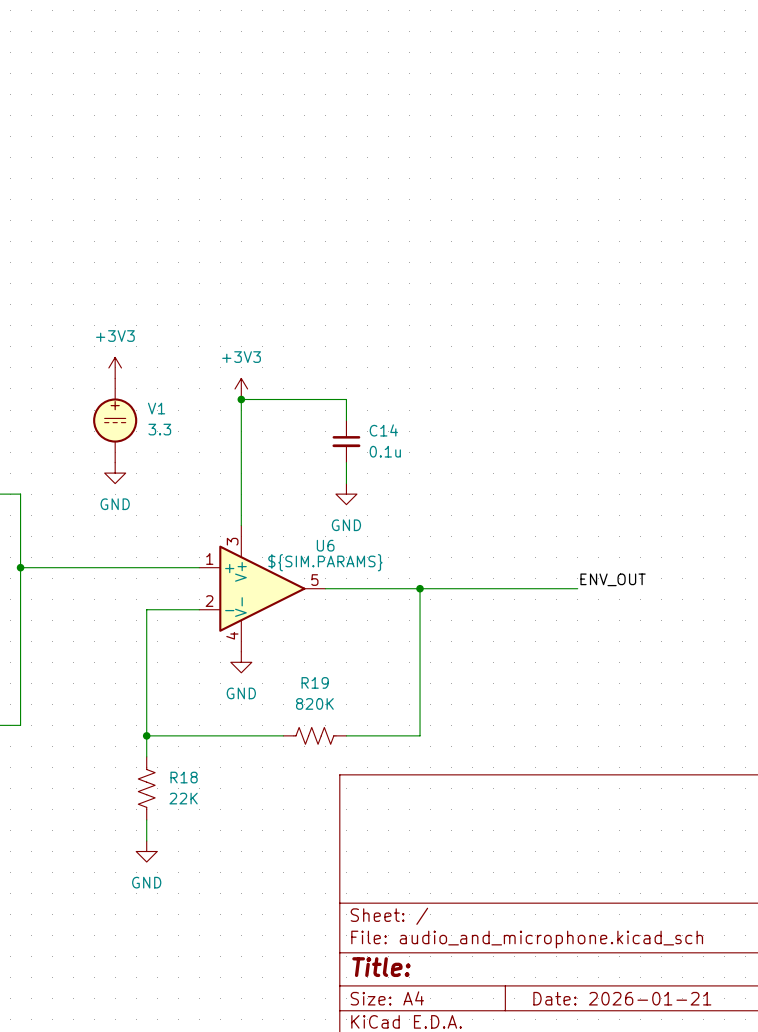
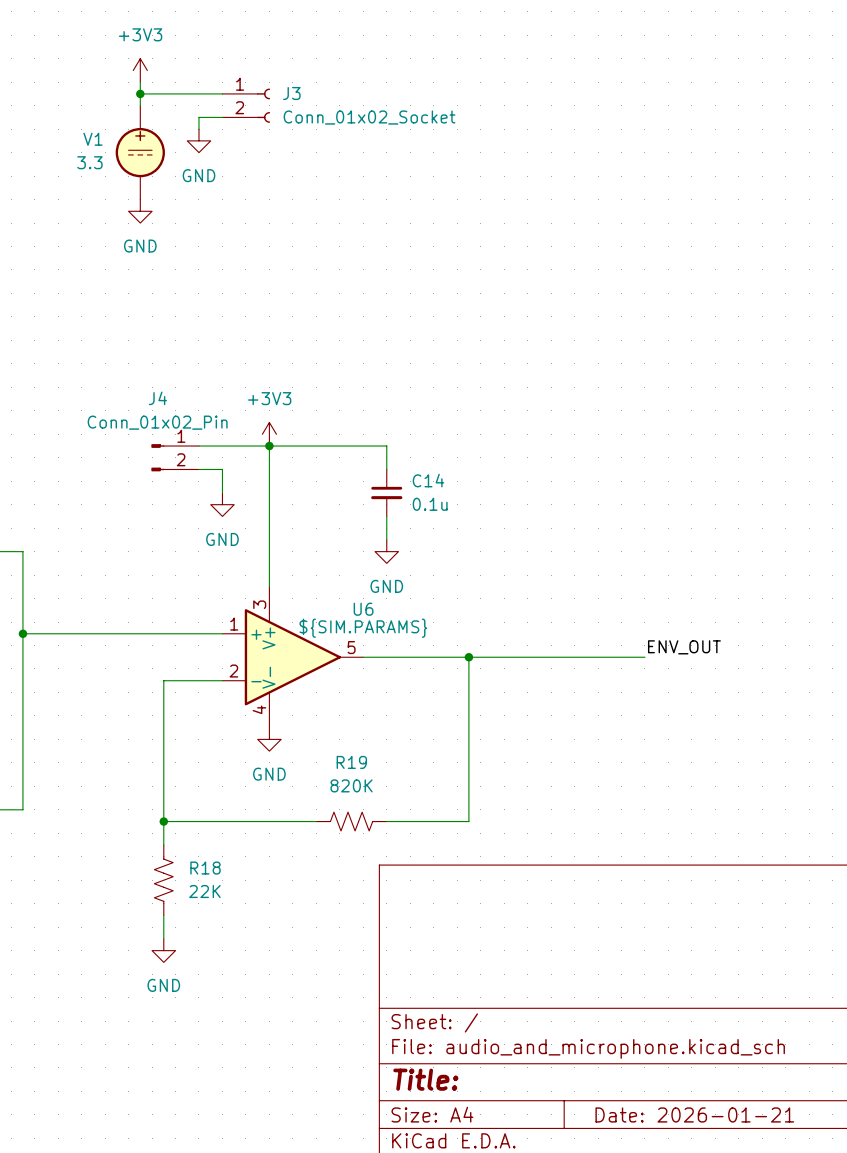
power symbol: none -> +3V3 (140, 70)
wire: none -> (140, 82) (140, 105)
wire: none -> (140, 93) (222, 93)
junction: none -> (140, 93)
J3: none -> Conn_01x02_Socket (246, 105)
wire: none -> (222, 117) (198, 117) (198, 129)
power symbol: none -> GND (198, 140)
power symbol: none -> GND (140, 211)
power symbol: +3V3 (115, 367) -> none
wire: none -> (198, 446) (269, 446)
V1 name position: V1 (156, 408) -> V1 (93, 139)
J4: none -> Conn_01x02_Pin (175, 457)
V1 position: (115, 420) -> (140, 152)
wire: none -> (198, 469) (222, 469) (222, 492)
V1 value position: 3.3 (159, 429) -> 3.3 (89, 162)
power symbol position: GND (115, 473) -> GND (222, 504)

